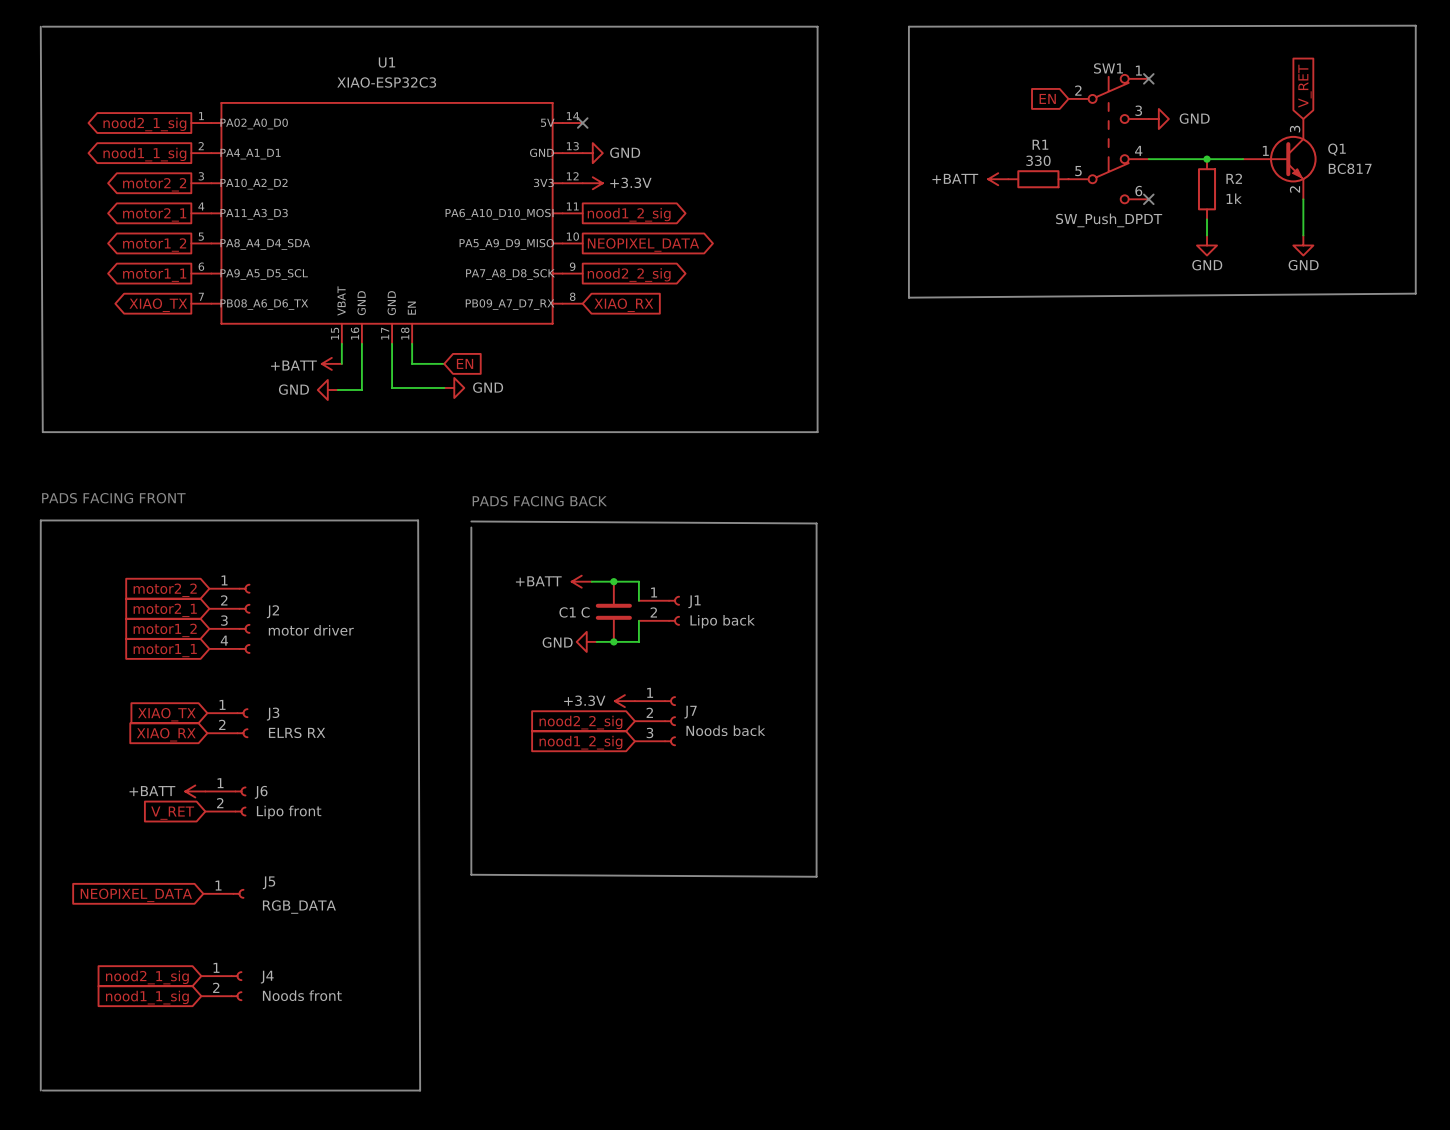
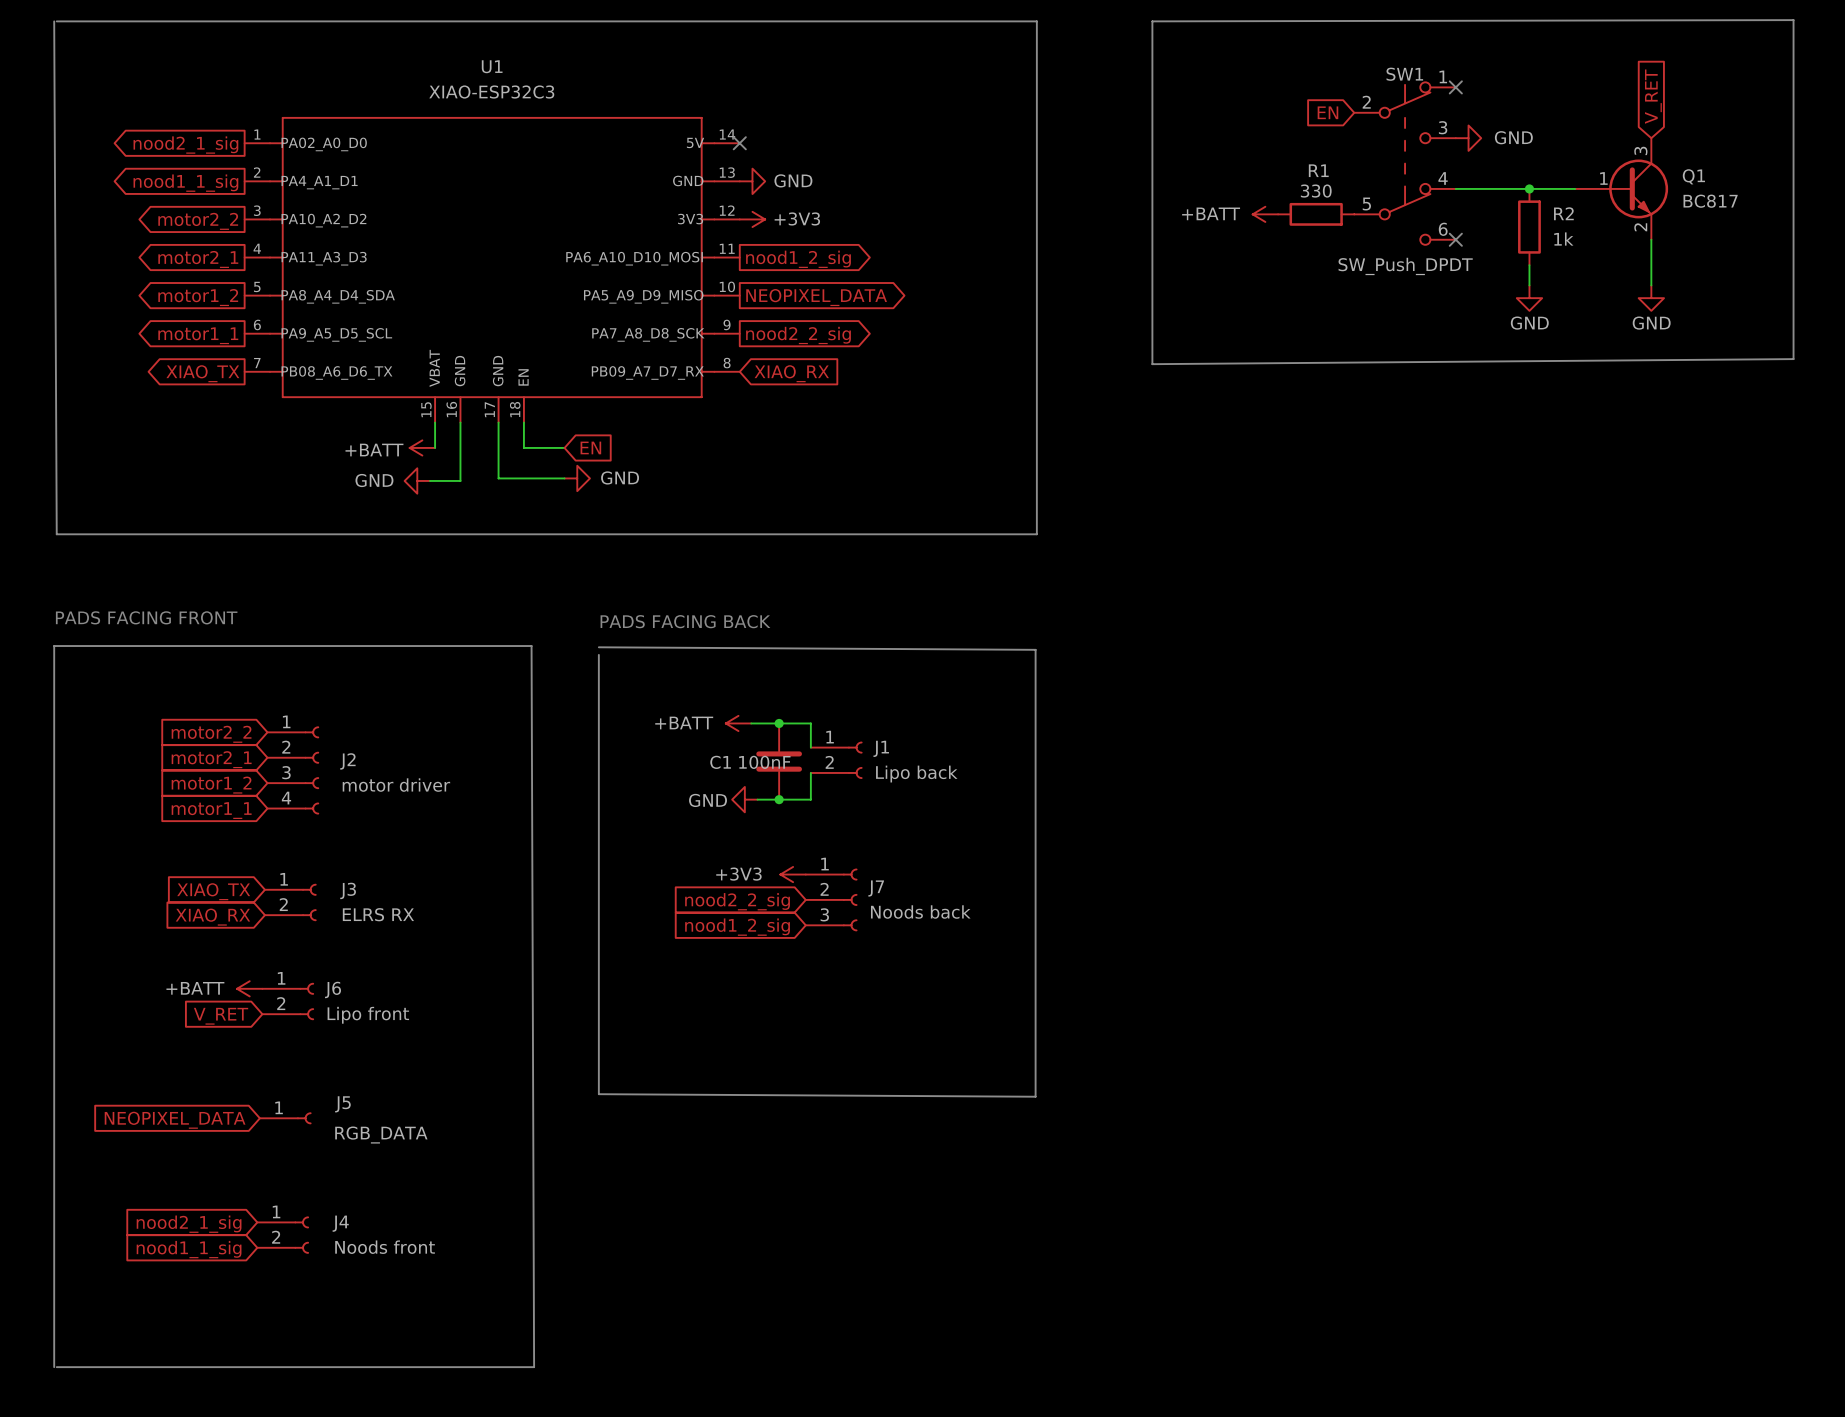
power symbol: +3.3V (592, 183) -> +3V3 (752, 219)
C1 value: C (585, 612) -> 100nF (764, 762)
power symbol: +3.3V (624, 701) -> +3V3 (793, 874)

